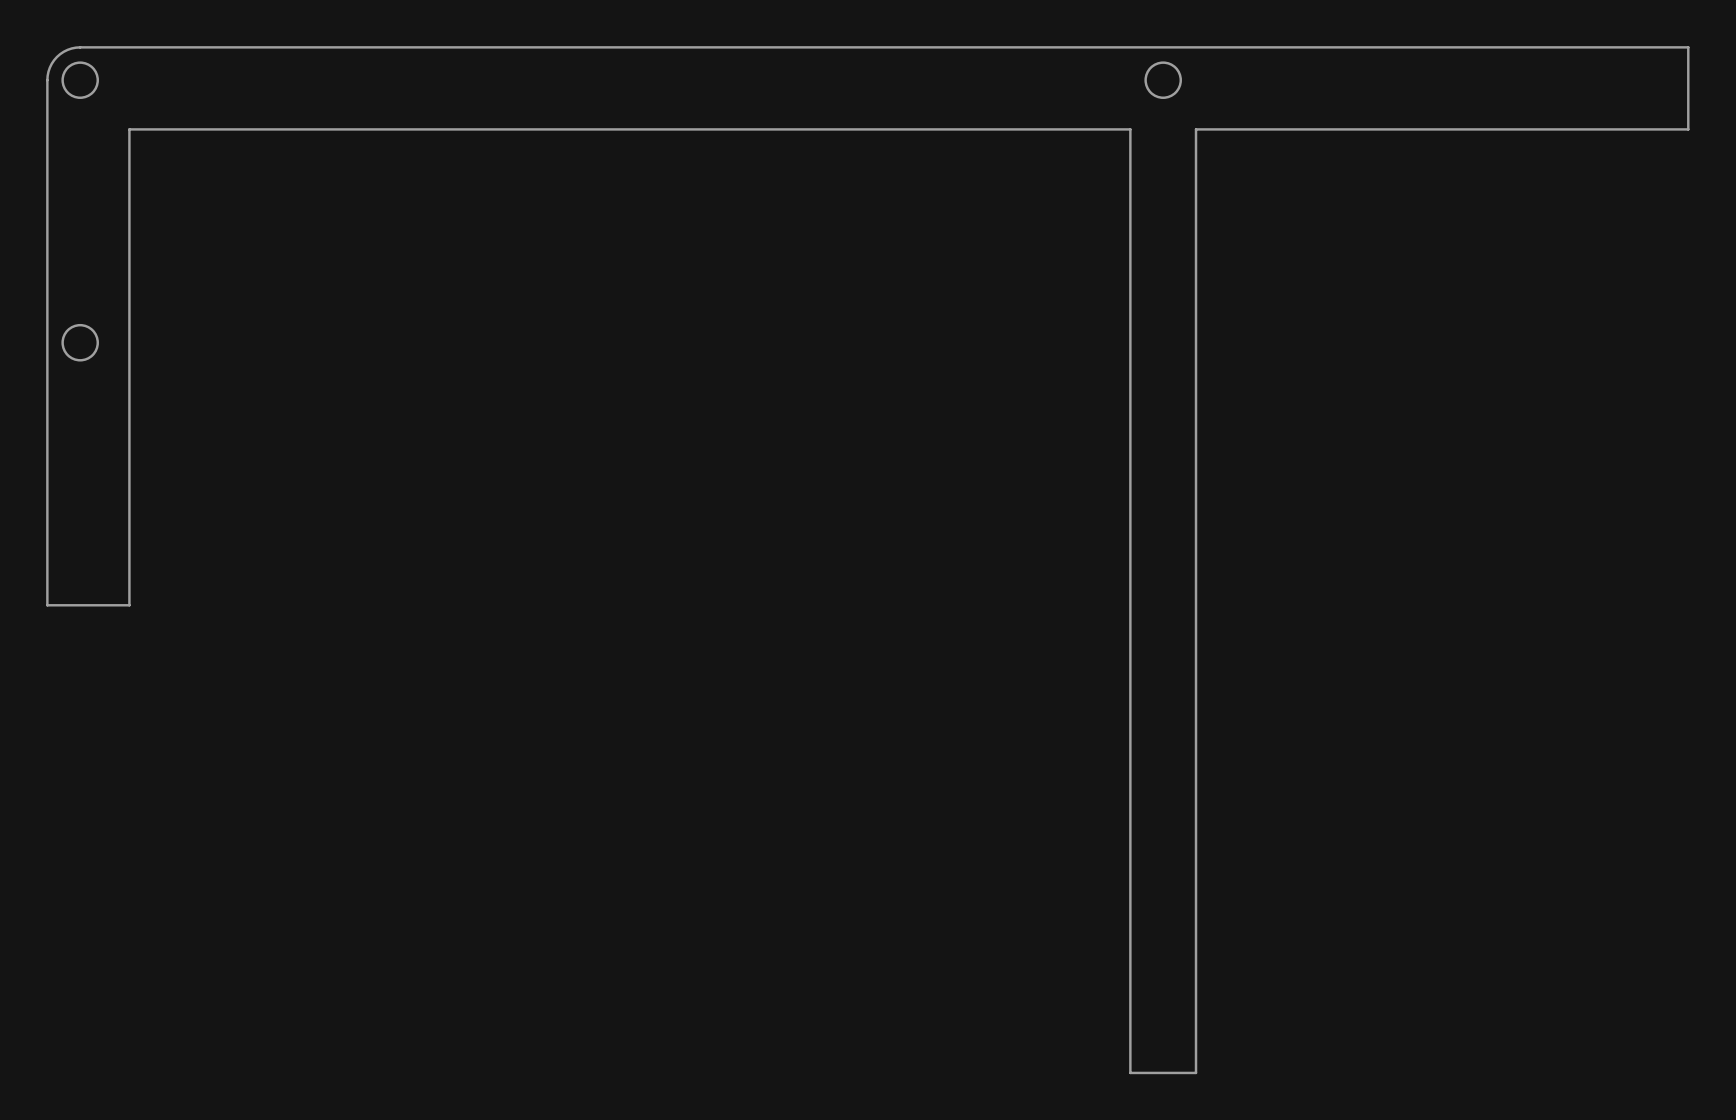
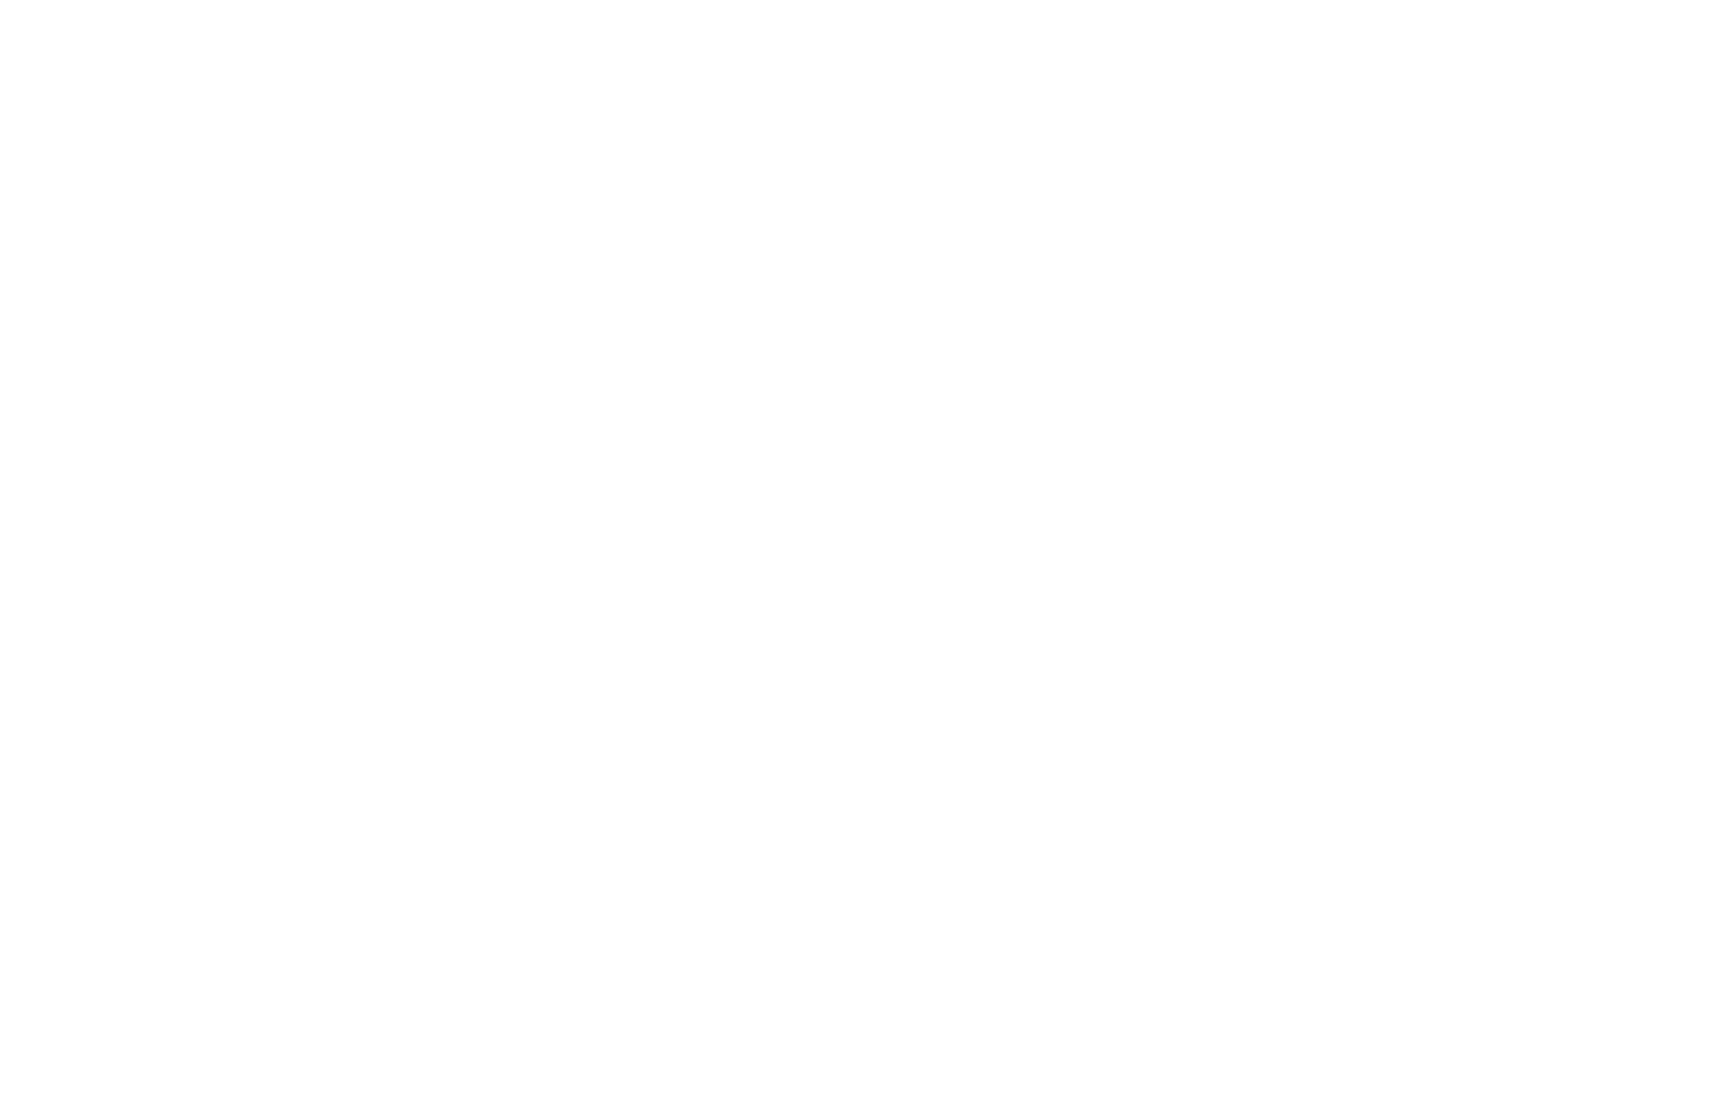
board edge: (80, 47) (1688, 47) (1688, 129) (1196, 129) (1196, 1072) (1130, 1072) (1130, 129) (129, 129) (129, 605) (47, 605) (47, 80) (49, 67) (56, 56) (67, 49) (80, 47) -> none
drawing: [61, 61, 99, 99] -> none
drawing: [1144, 61, 1182, 99] -> none
drawing: [61, 323, 99, 362] -> none

